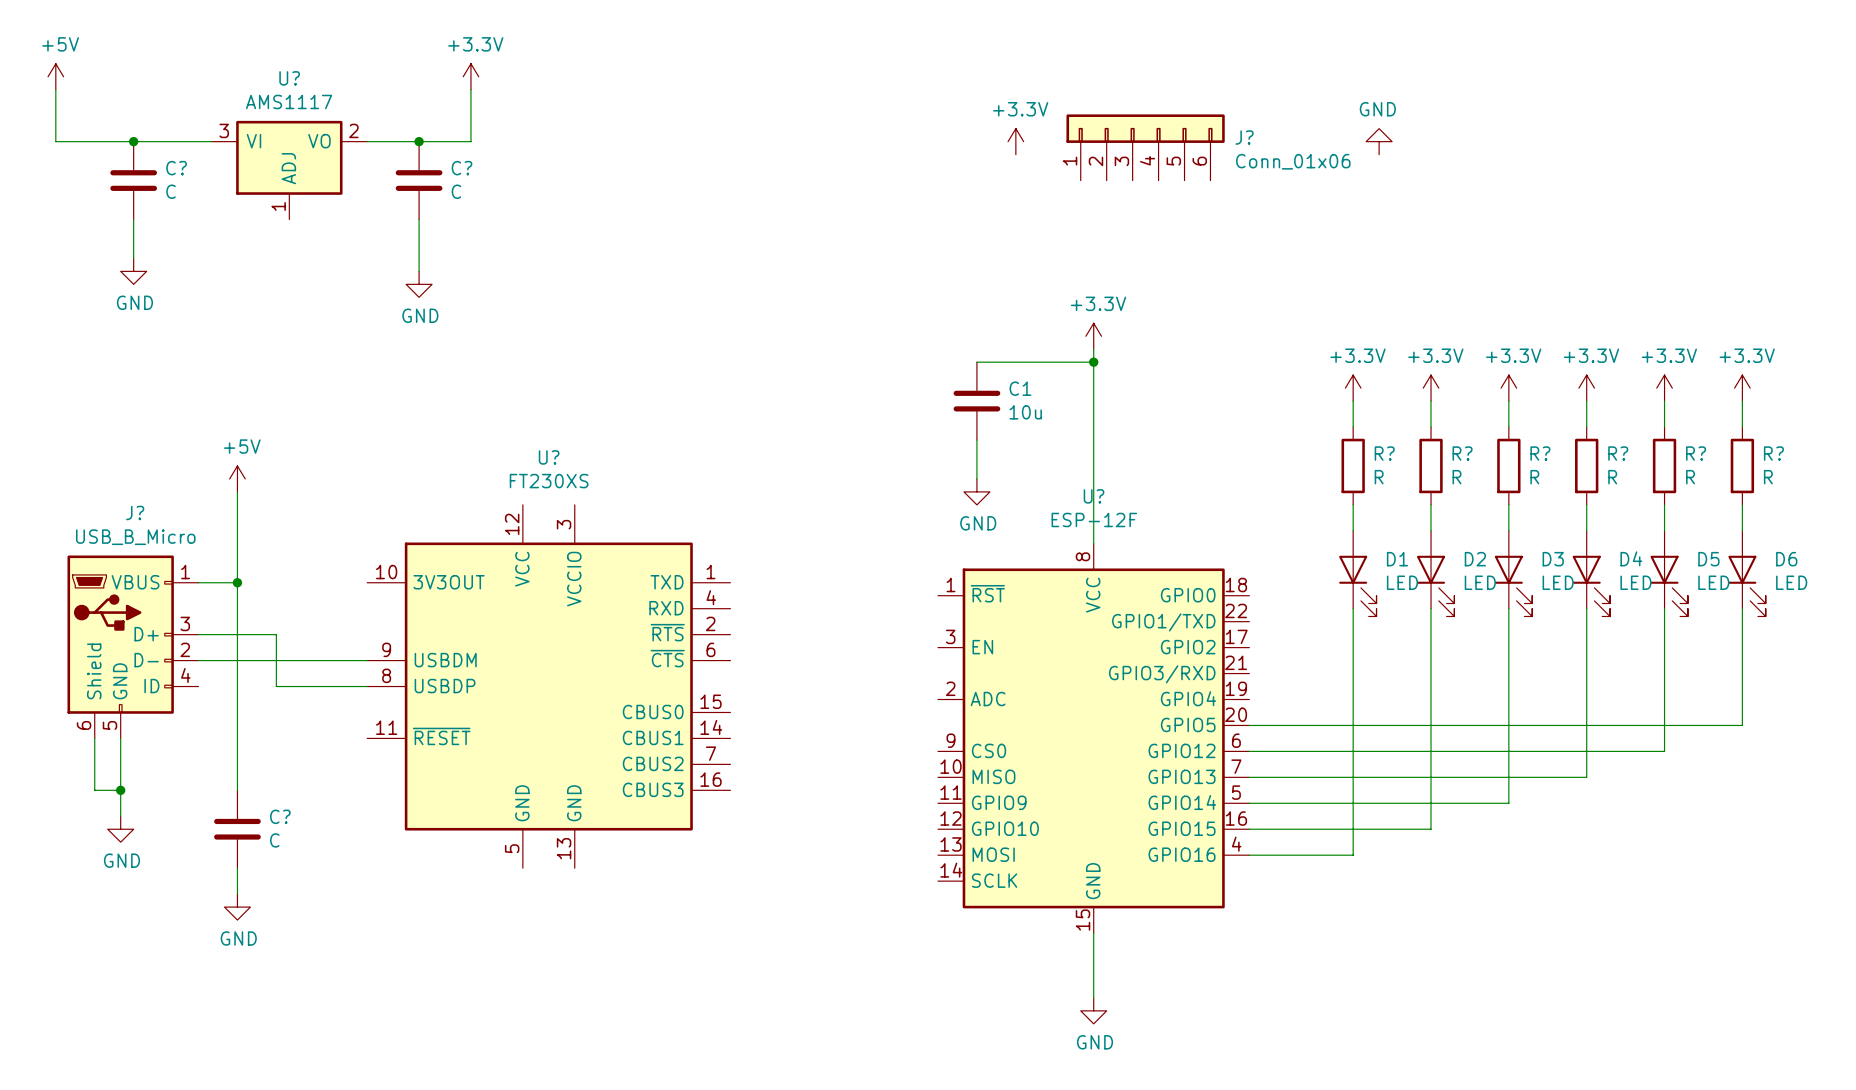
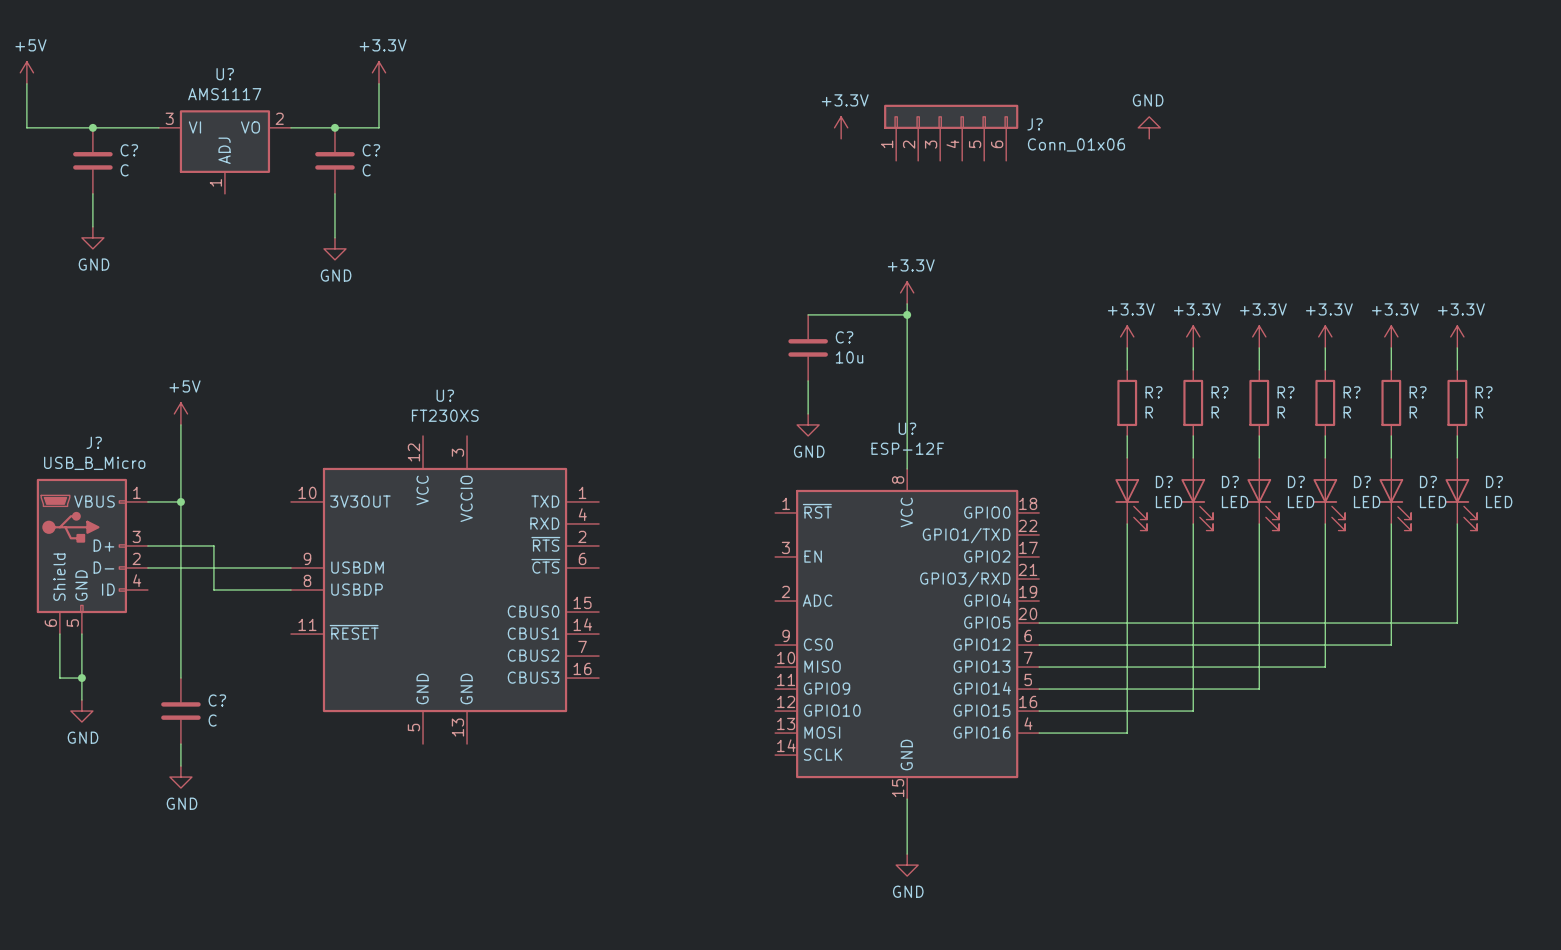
C1 name: C1 (1020, 388) -> C? (844, 337)
D4 name: D4 (1631, 558) -> D? (1362, 481)
D1 name: D1 (1397, 559) -> D? (1164, 481)
D2 name: D2 (1475, 559) -> D? (1230, 481)
D3 name: D3 (1553, 559) -> D? (1296, 481)
D5 name: D5 (1708, 559) -> D? (1428, 481)
D6 name: D6 (1786, 559) -> D? (1494, 481)

